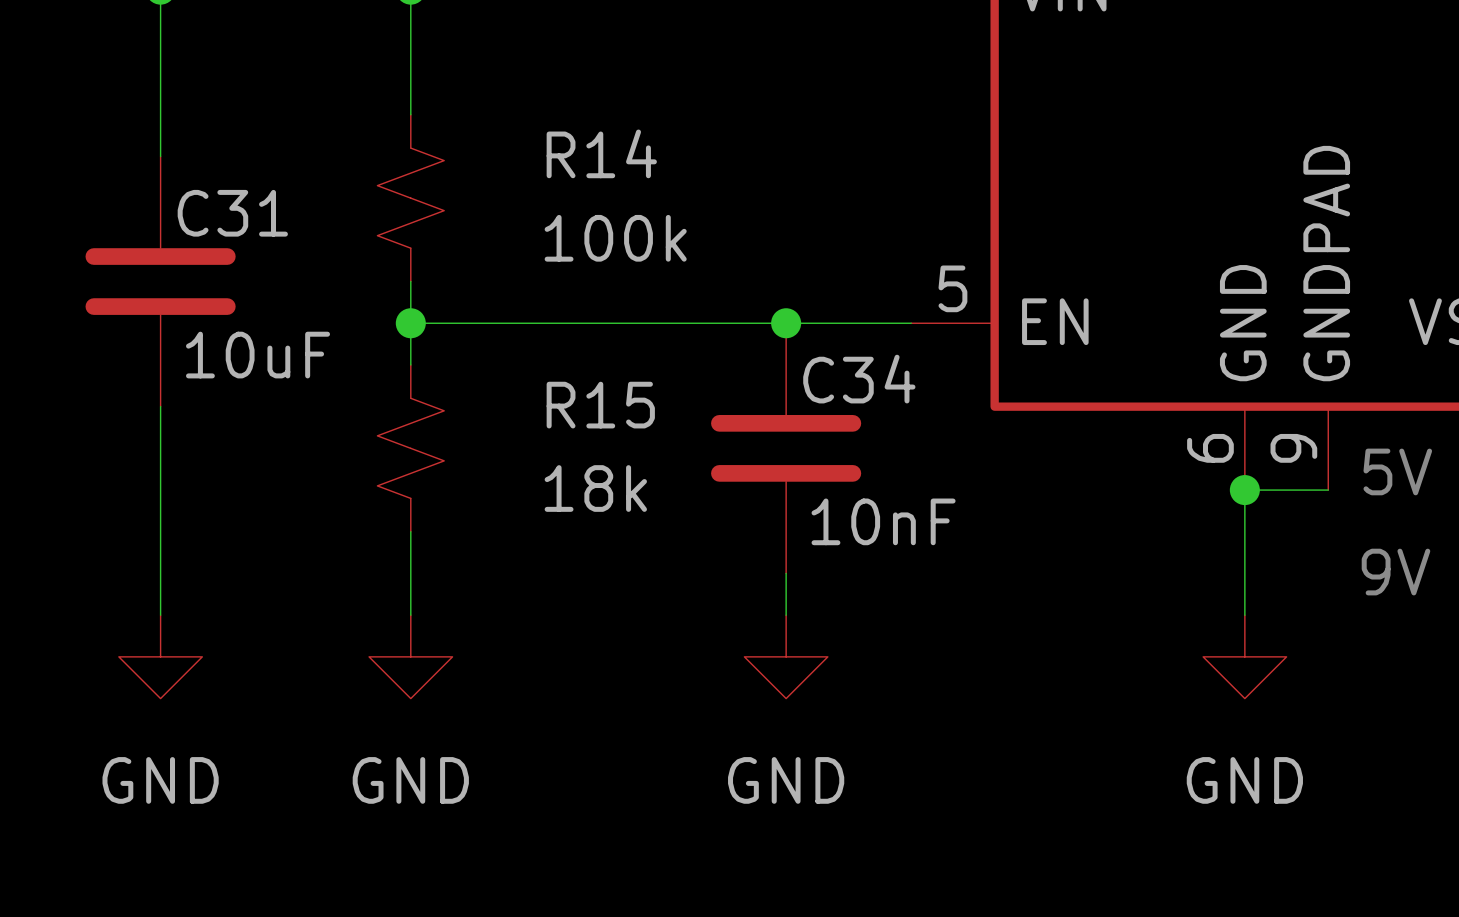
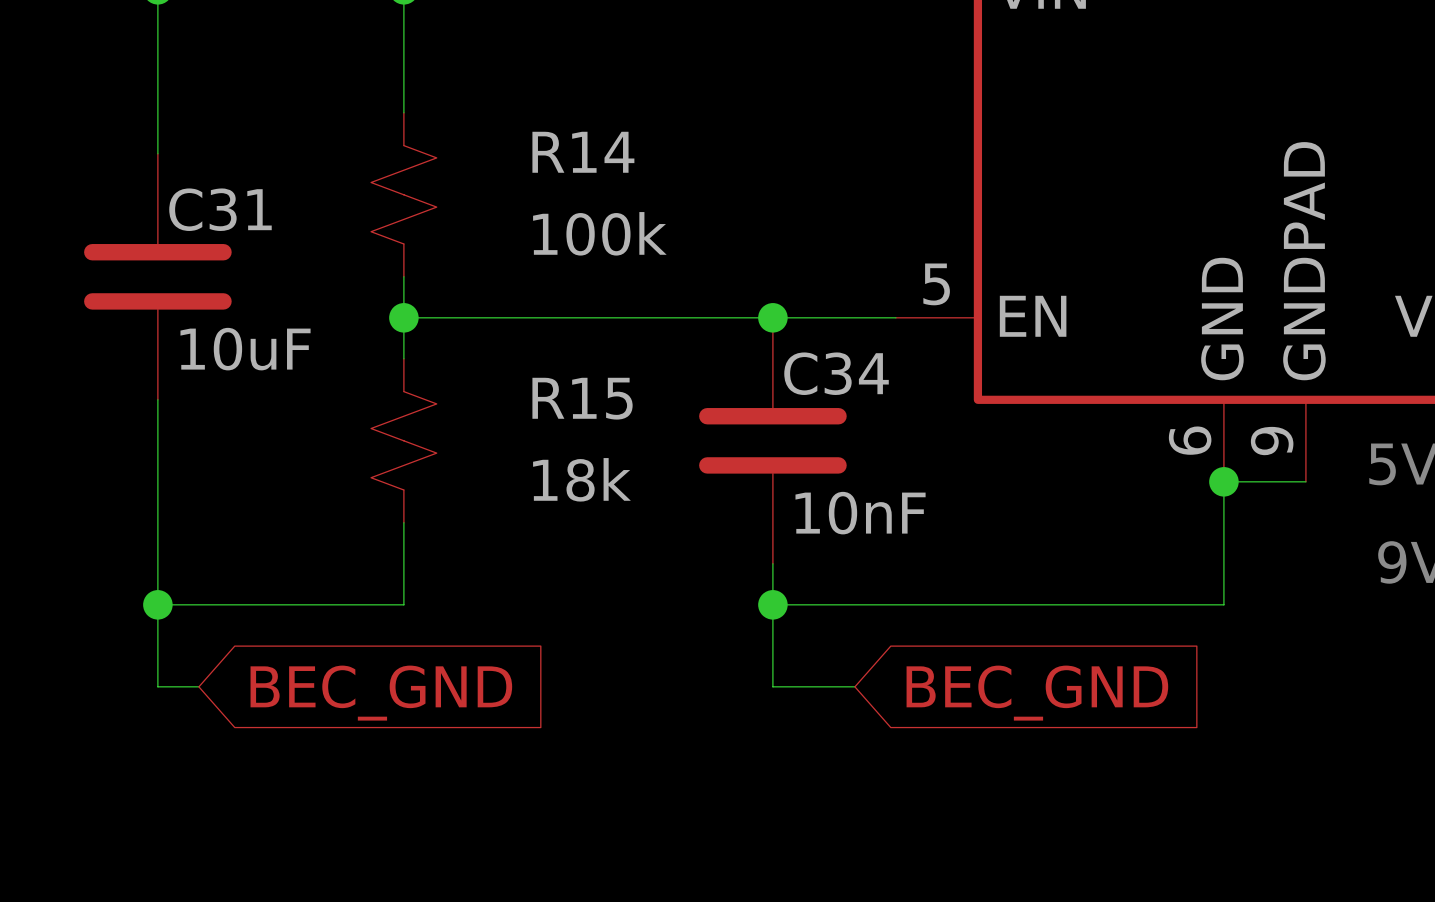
junction: none -> (157, 604)
wire: none -> (403, 604) (157, 604) (157, 686) (198, 686)
junction: none -> (772, 604)
wire: none -> (1223, 604) (772, 604) (772, 686) (854, 686)
power symbol: GND (160, 656) -> none
power symbol: GND (410, 656) -> none
power symbol: GND (786, 656) -> none
power symbol: GND (1244, 656) -> none
global label: none -> BEC_GND (381, 693)
global label: none -> BEC_GND (1037, 693)

